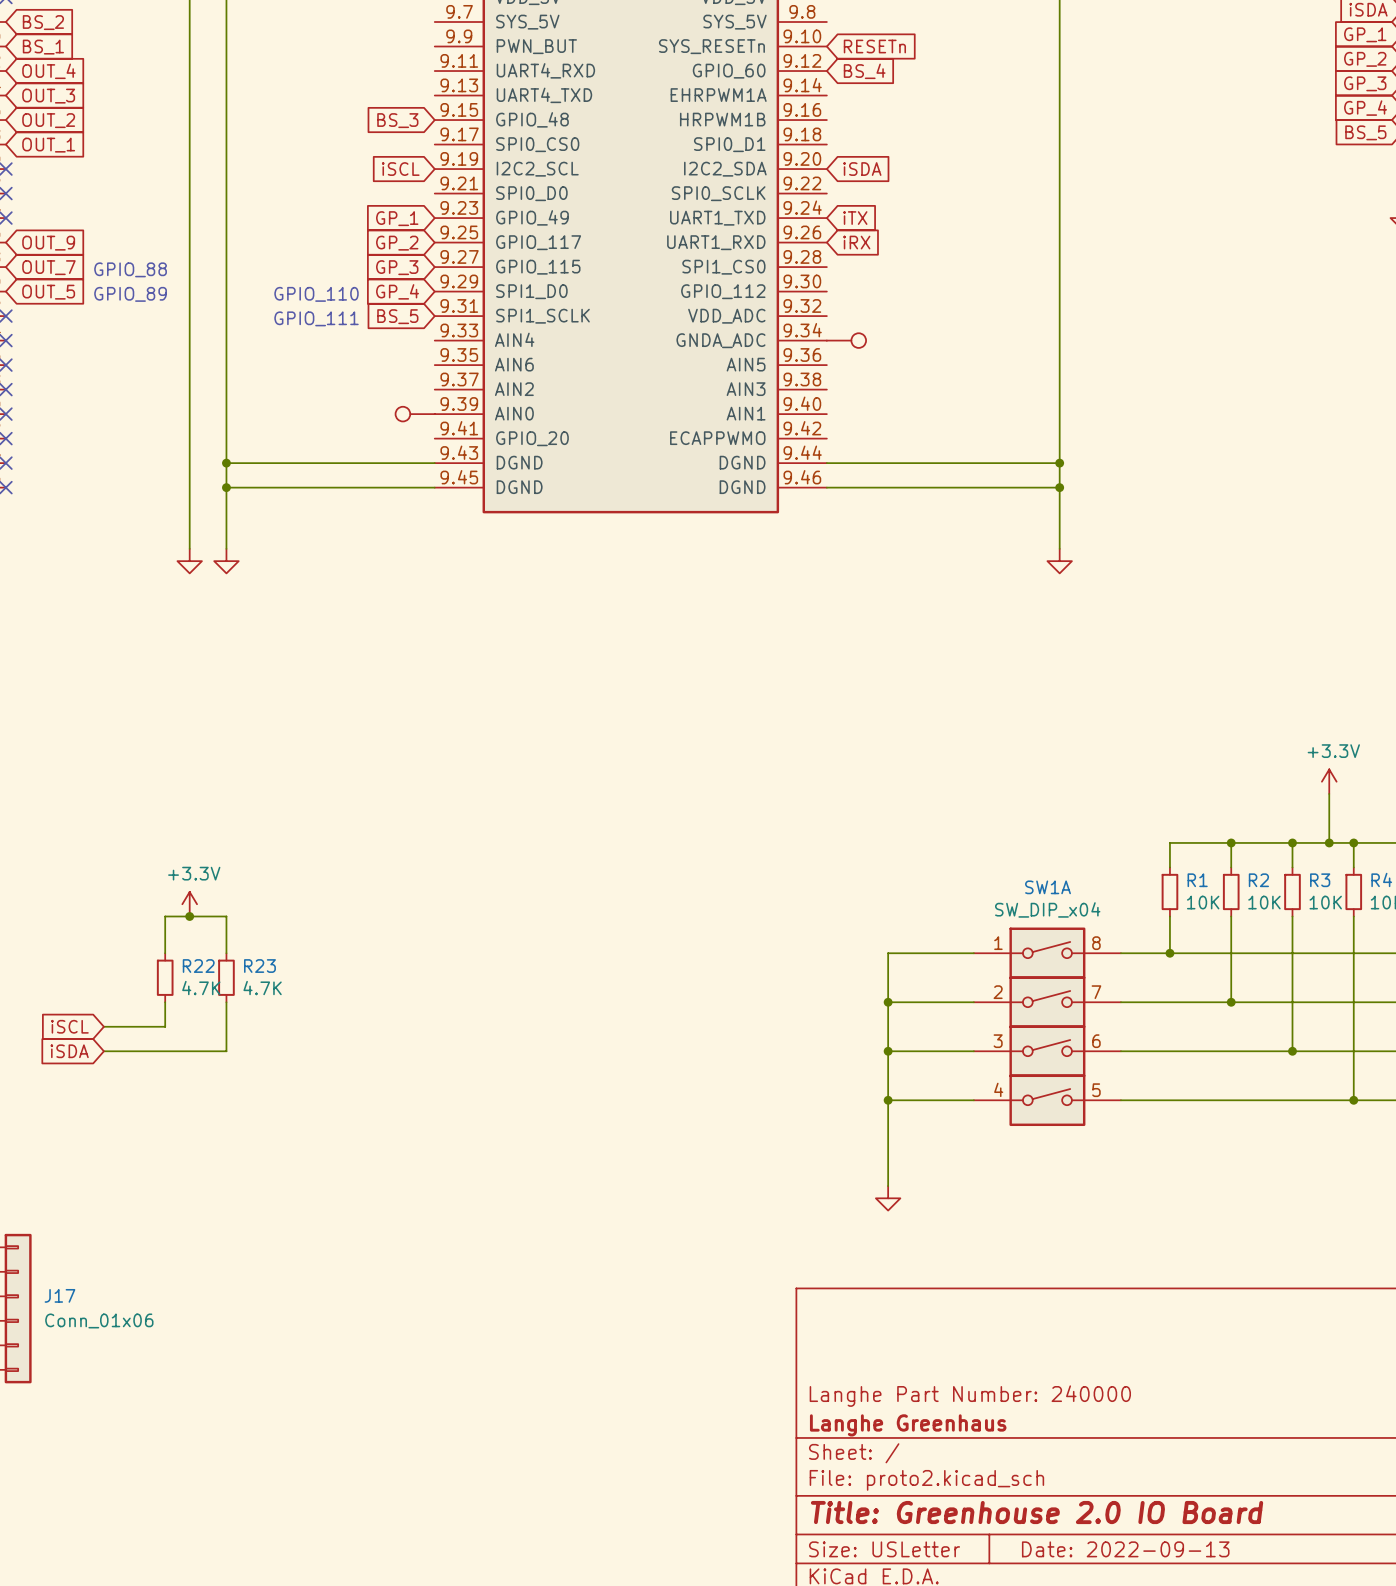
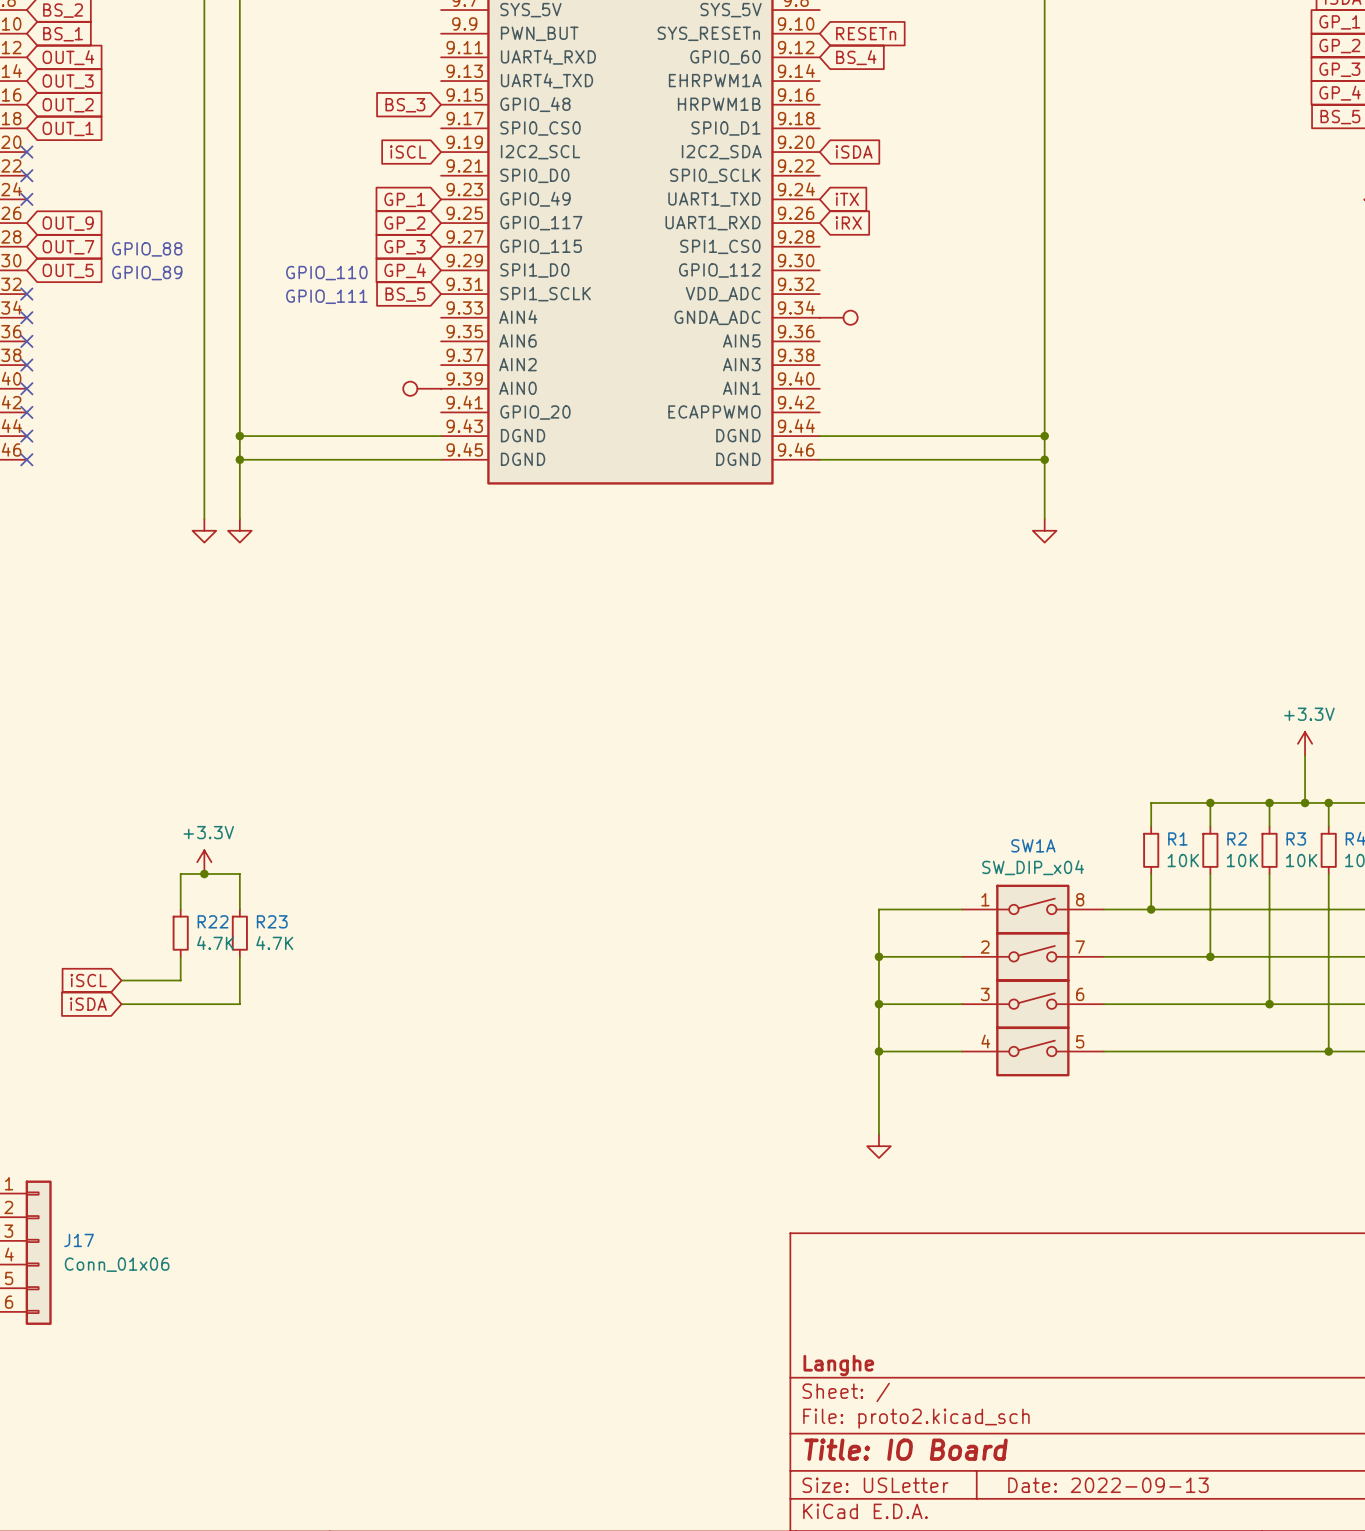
title block: Langhe Part Number: 240000 (970, 1396) -> none
title block: Langhe Greenhaus (908, 1425) -> Langhe (838, 1365)
title block: Title: Greenhouse 2.0 IO Board (1037, 1512) -> Title: IO Board (906, 1449)

